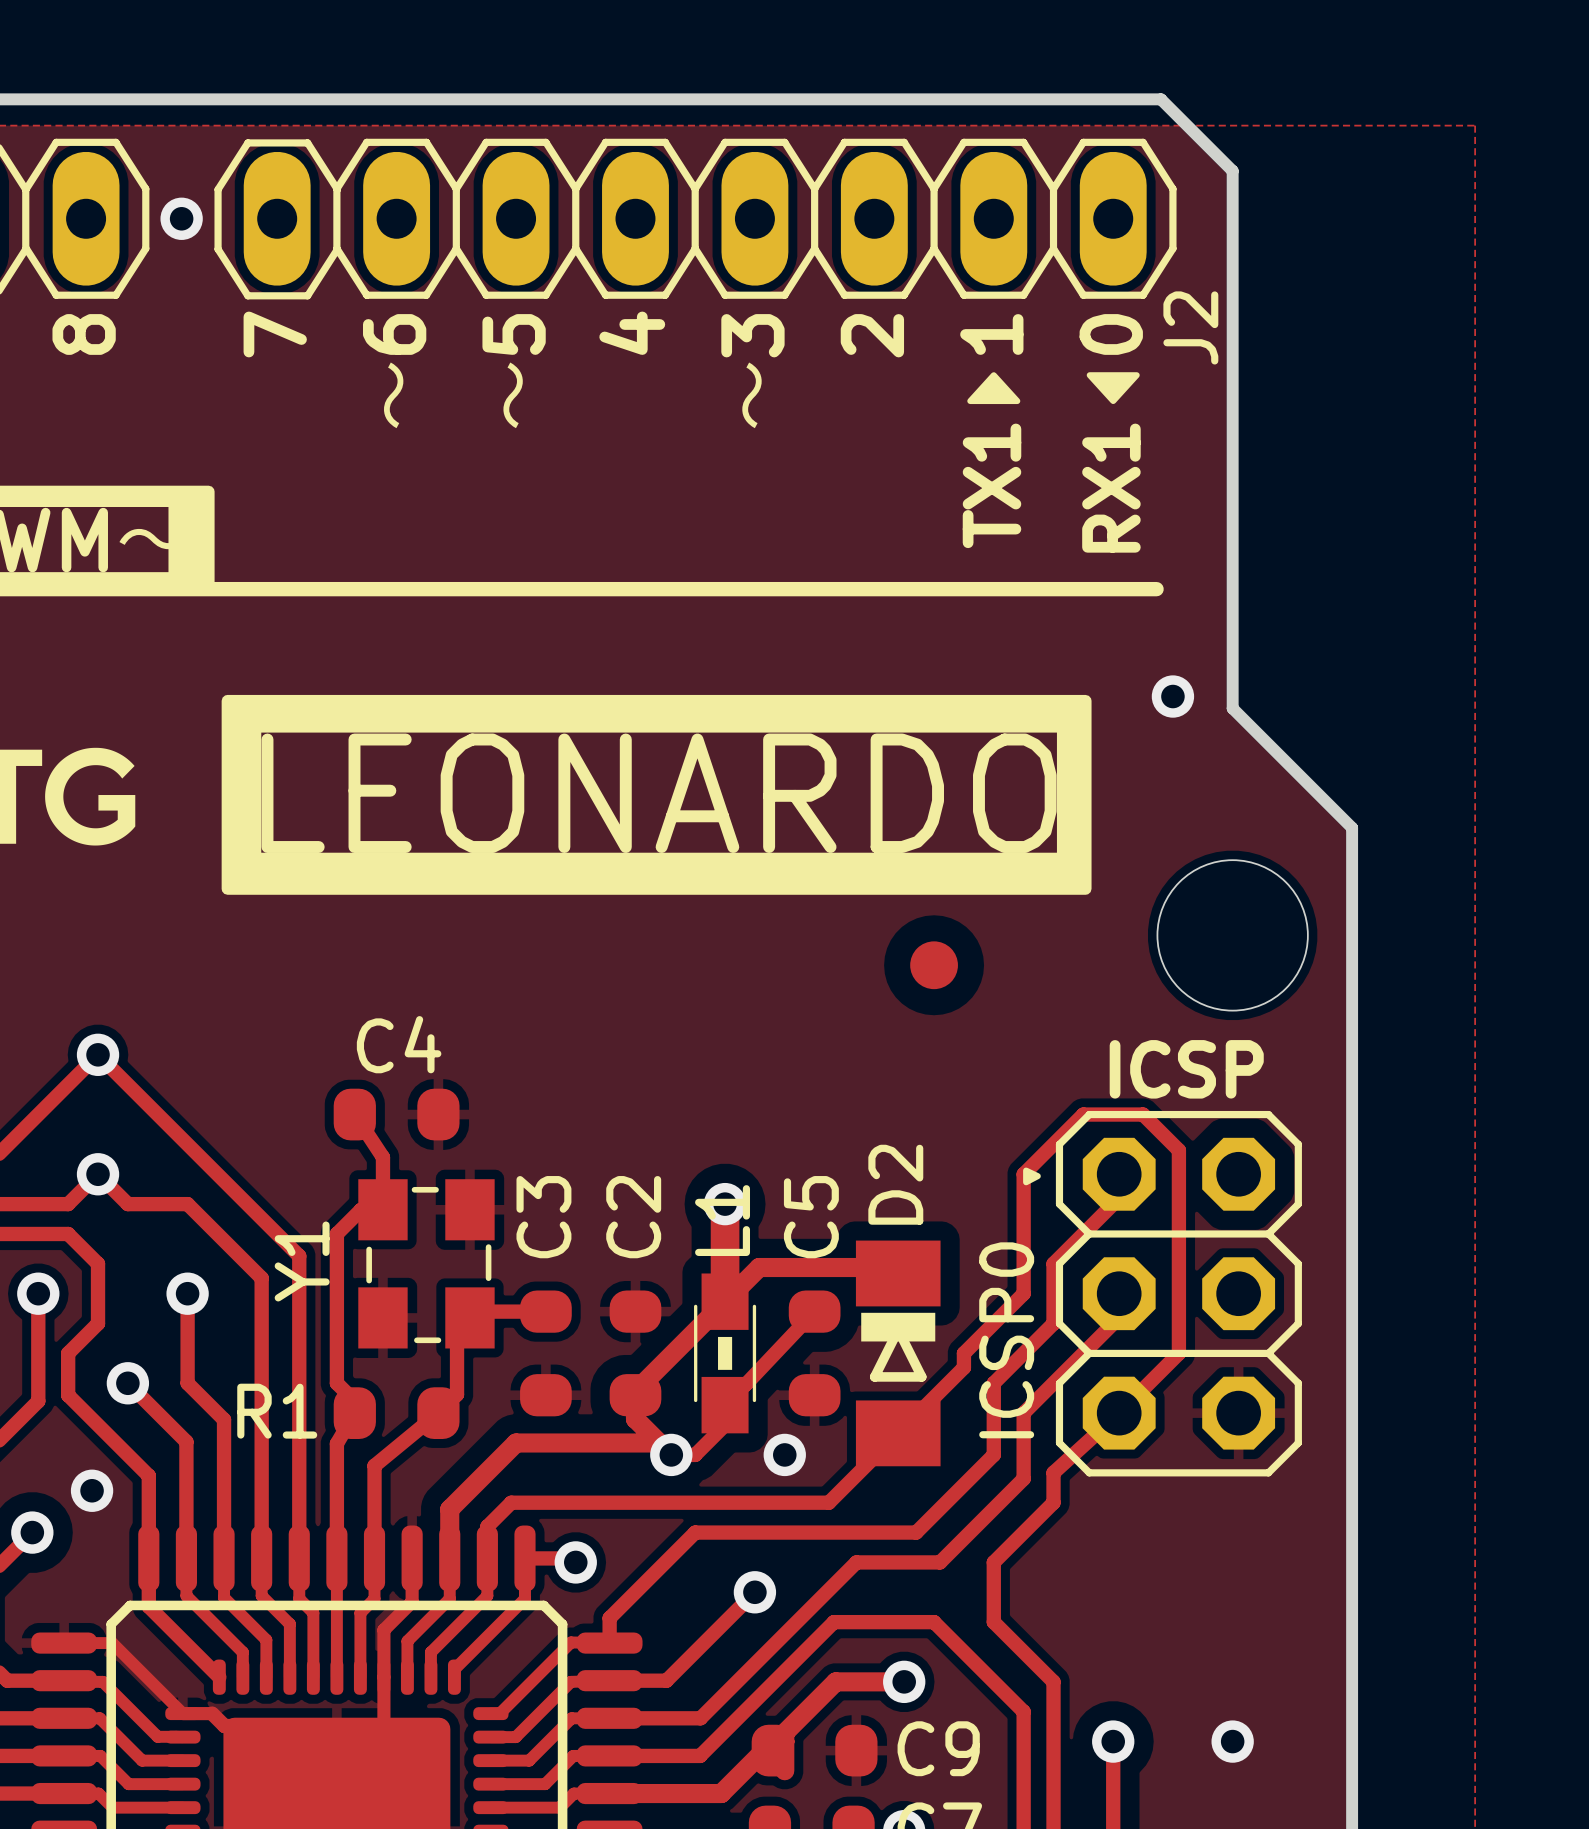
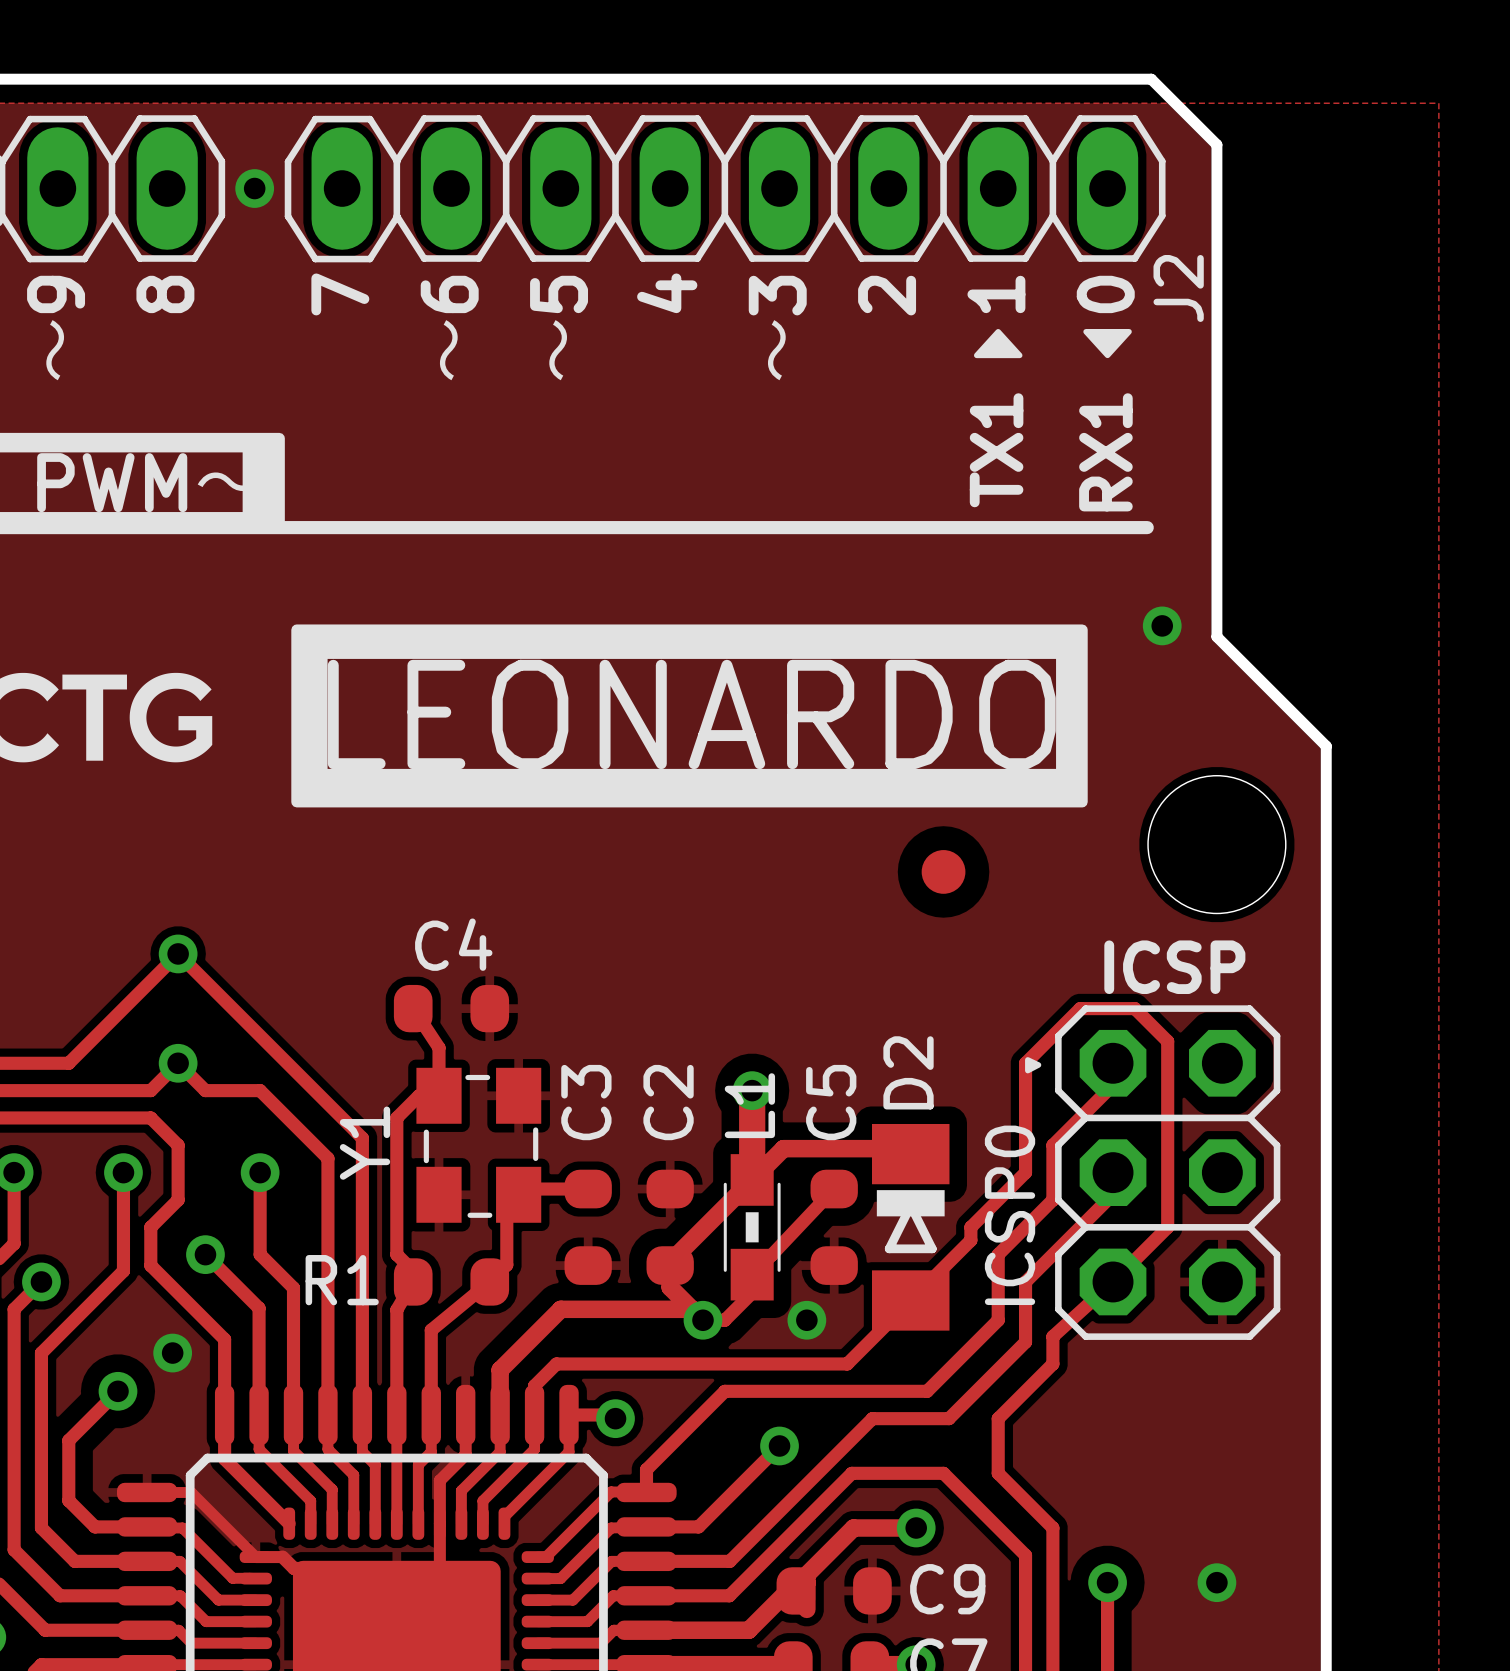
text position: TX1 (992, 485) -> TX1 (996, 450)
text position: RX1 (1111, 488) -> RX1 (1105, 452)

